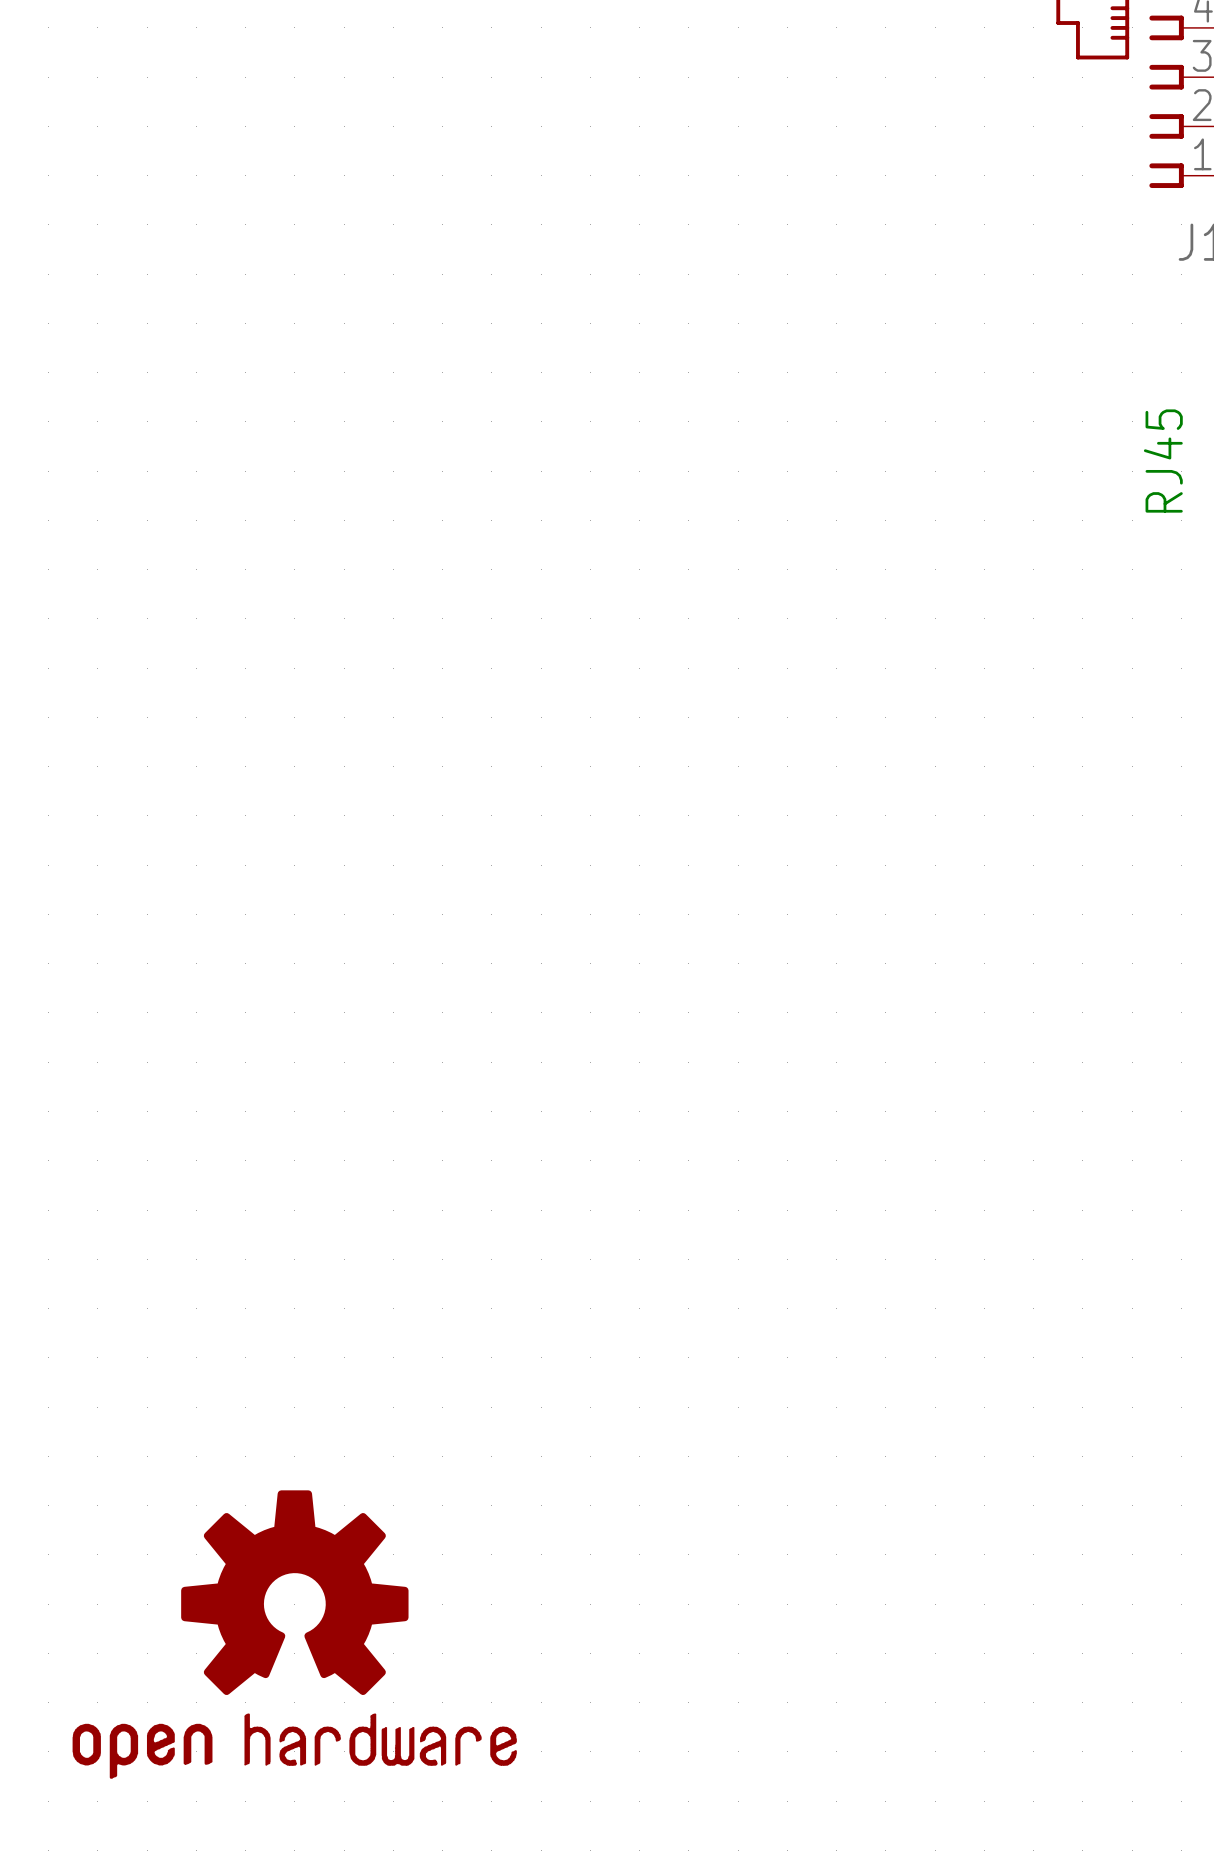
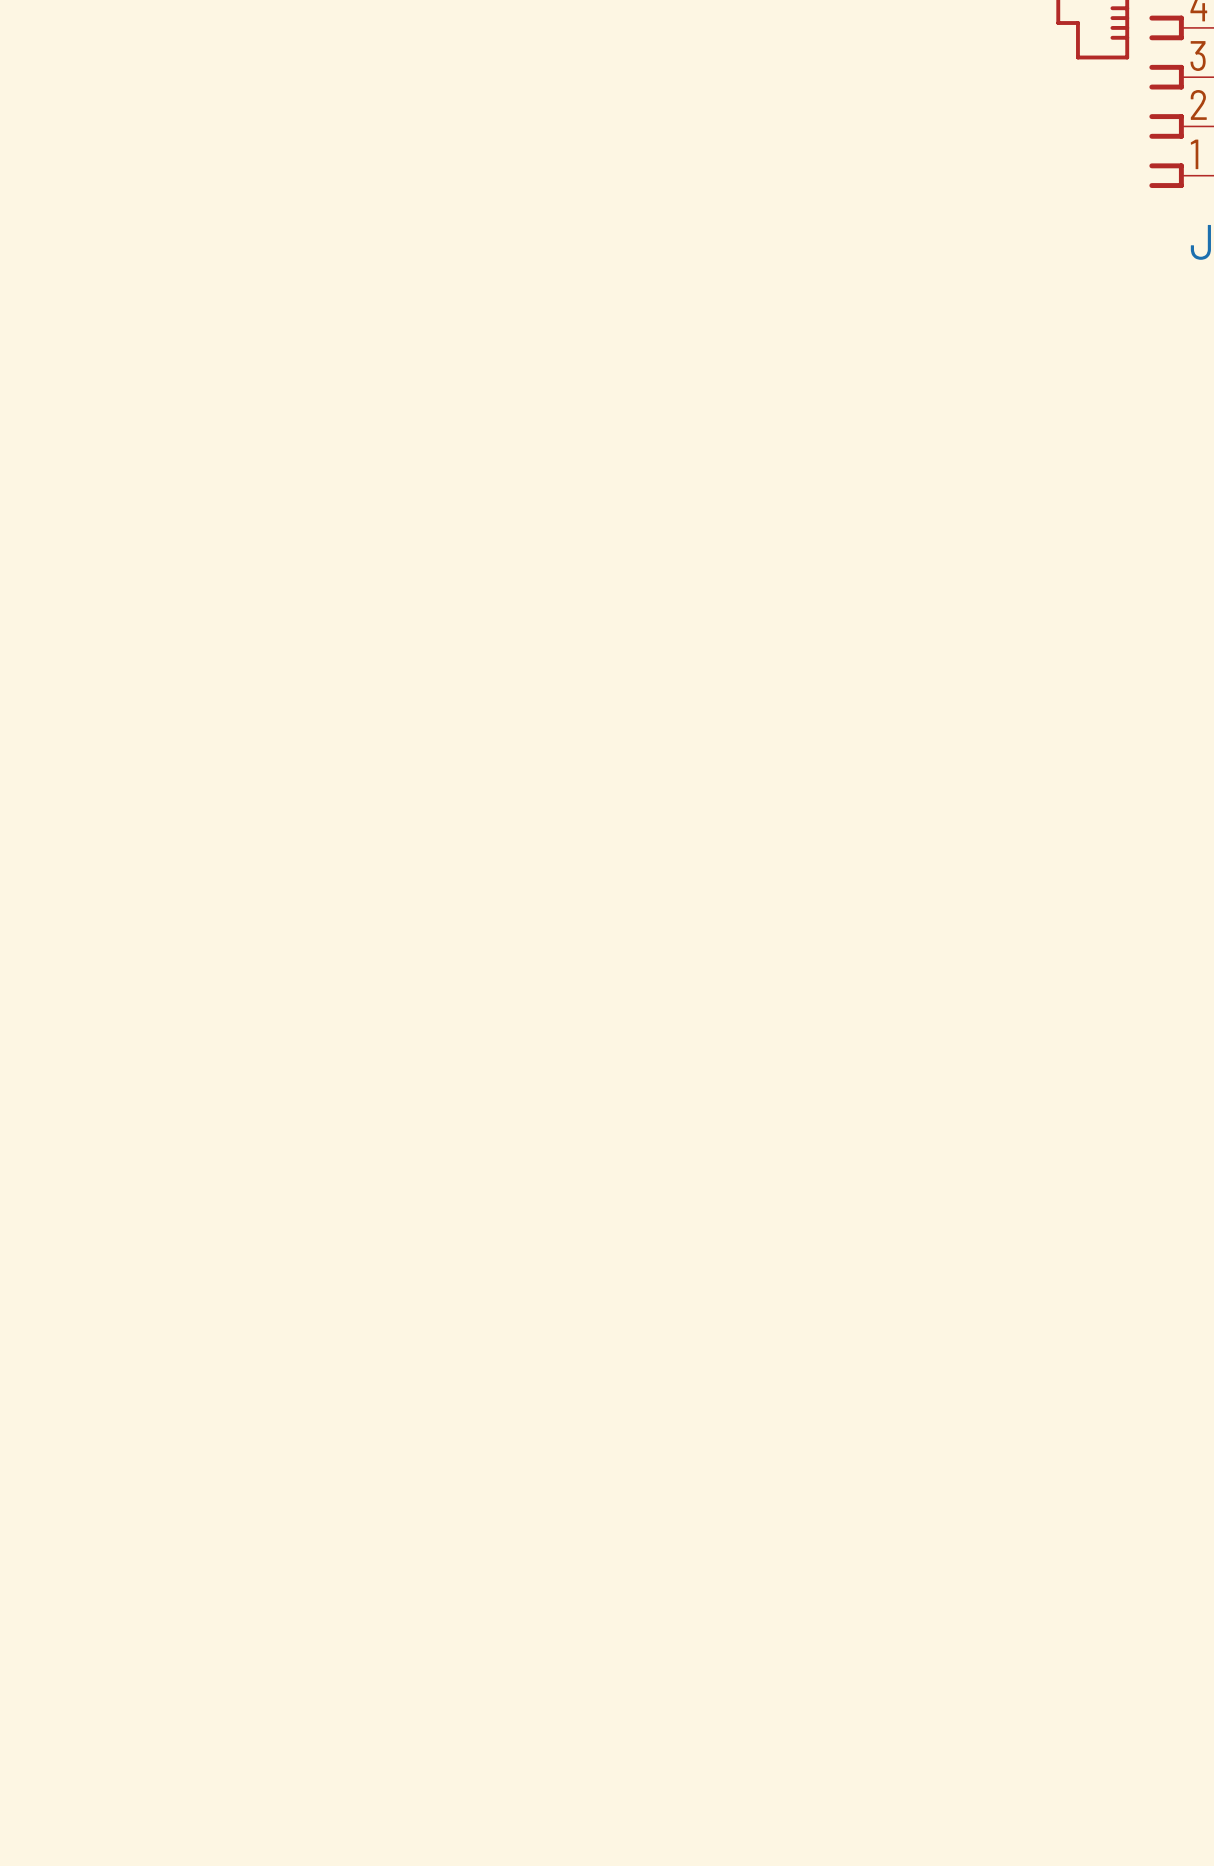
text: RJ45 (1163, 461) -> none
part: (294, 1634) -> none

